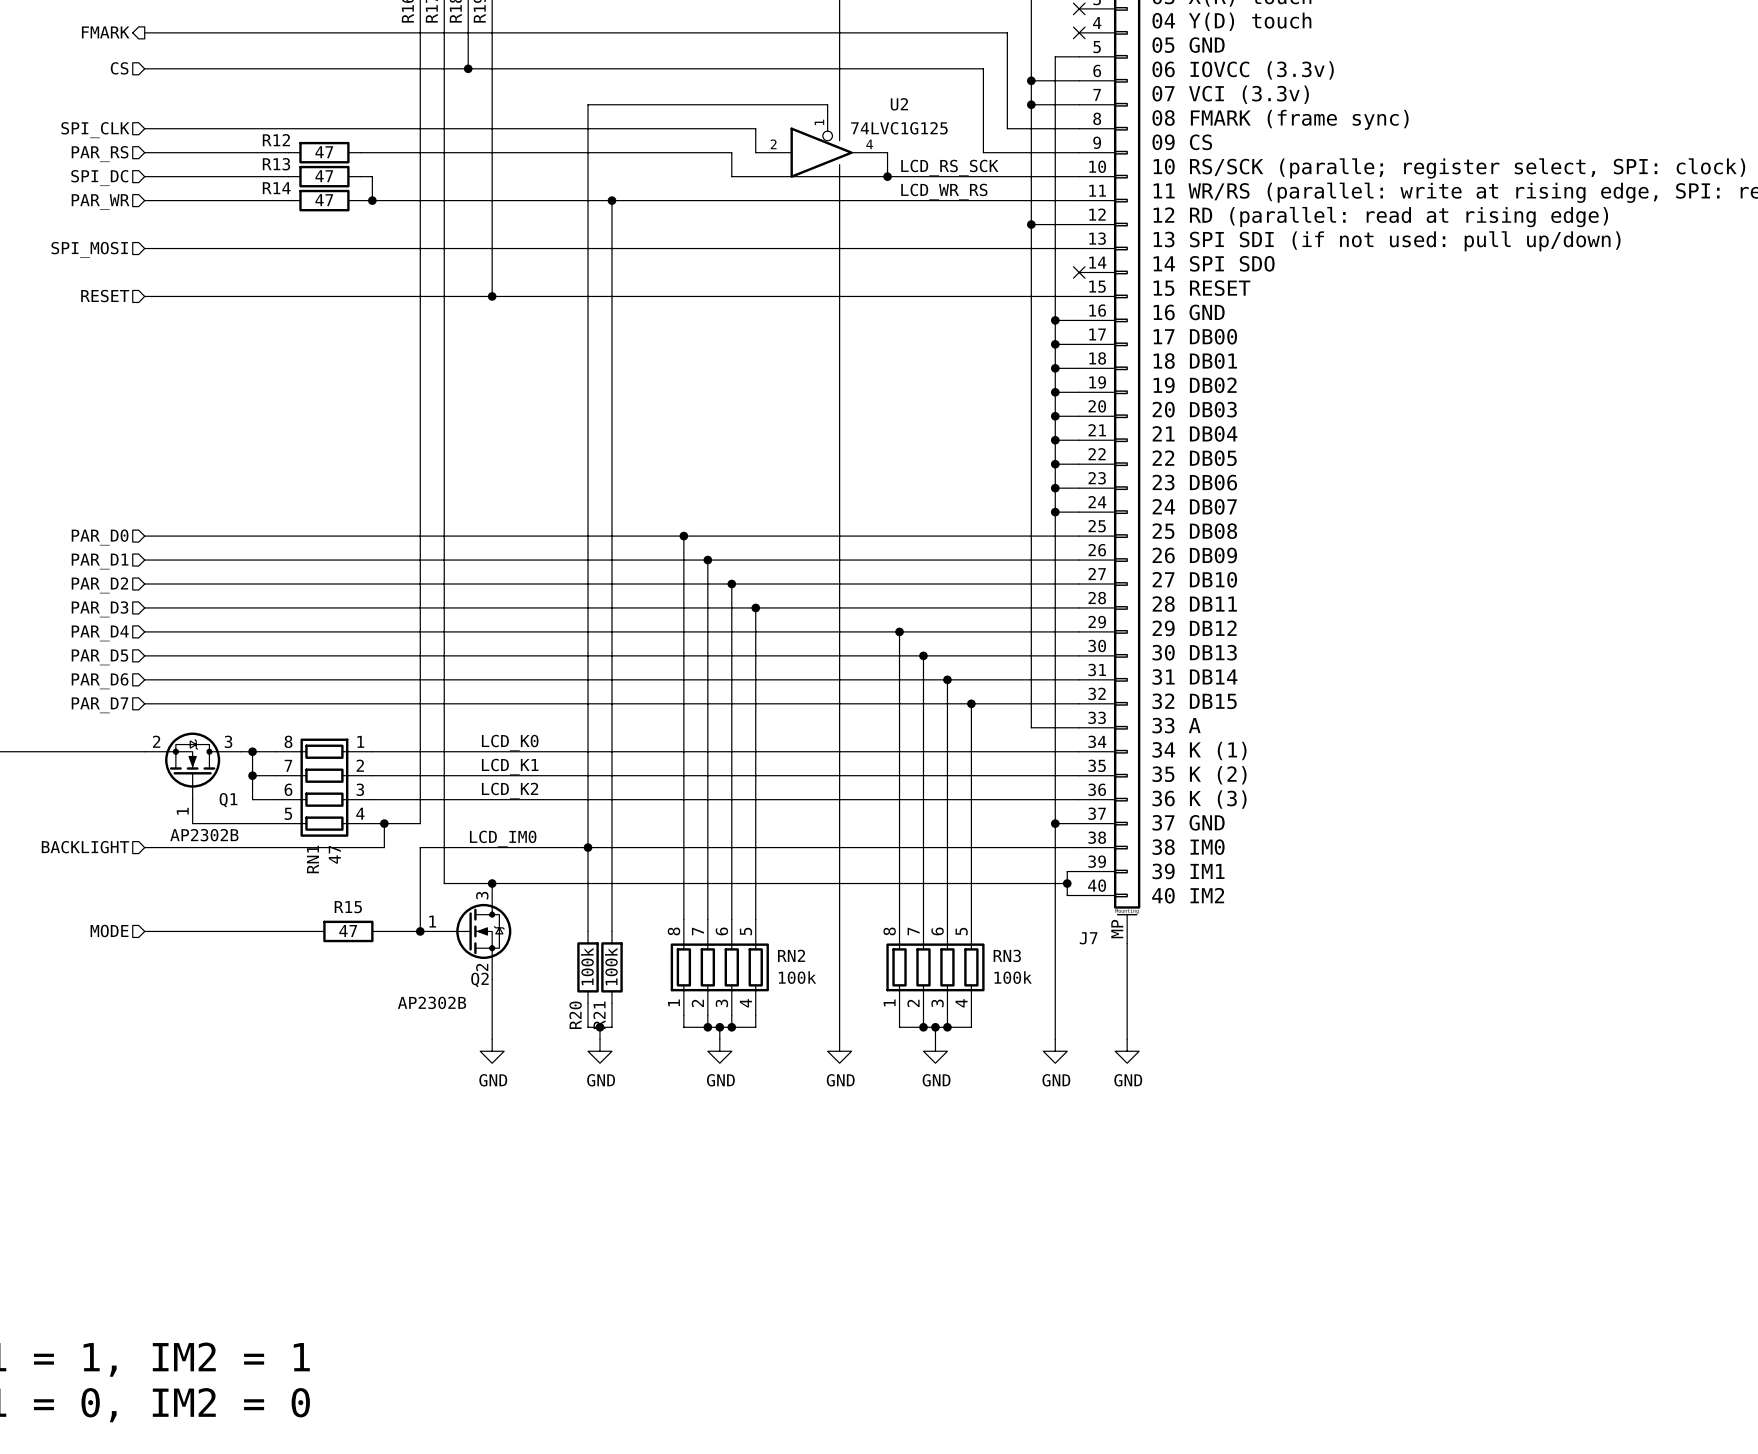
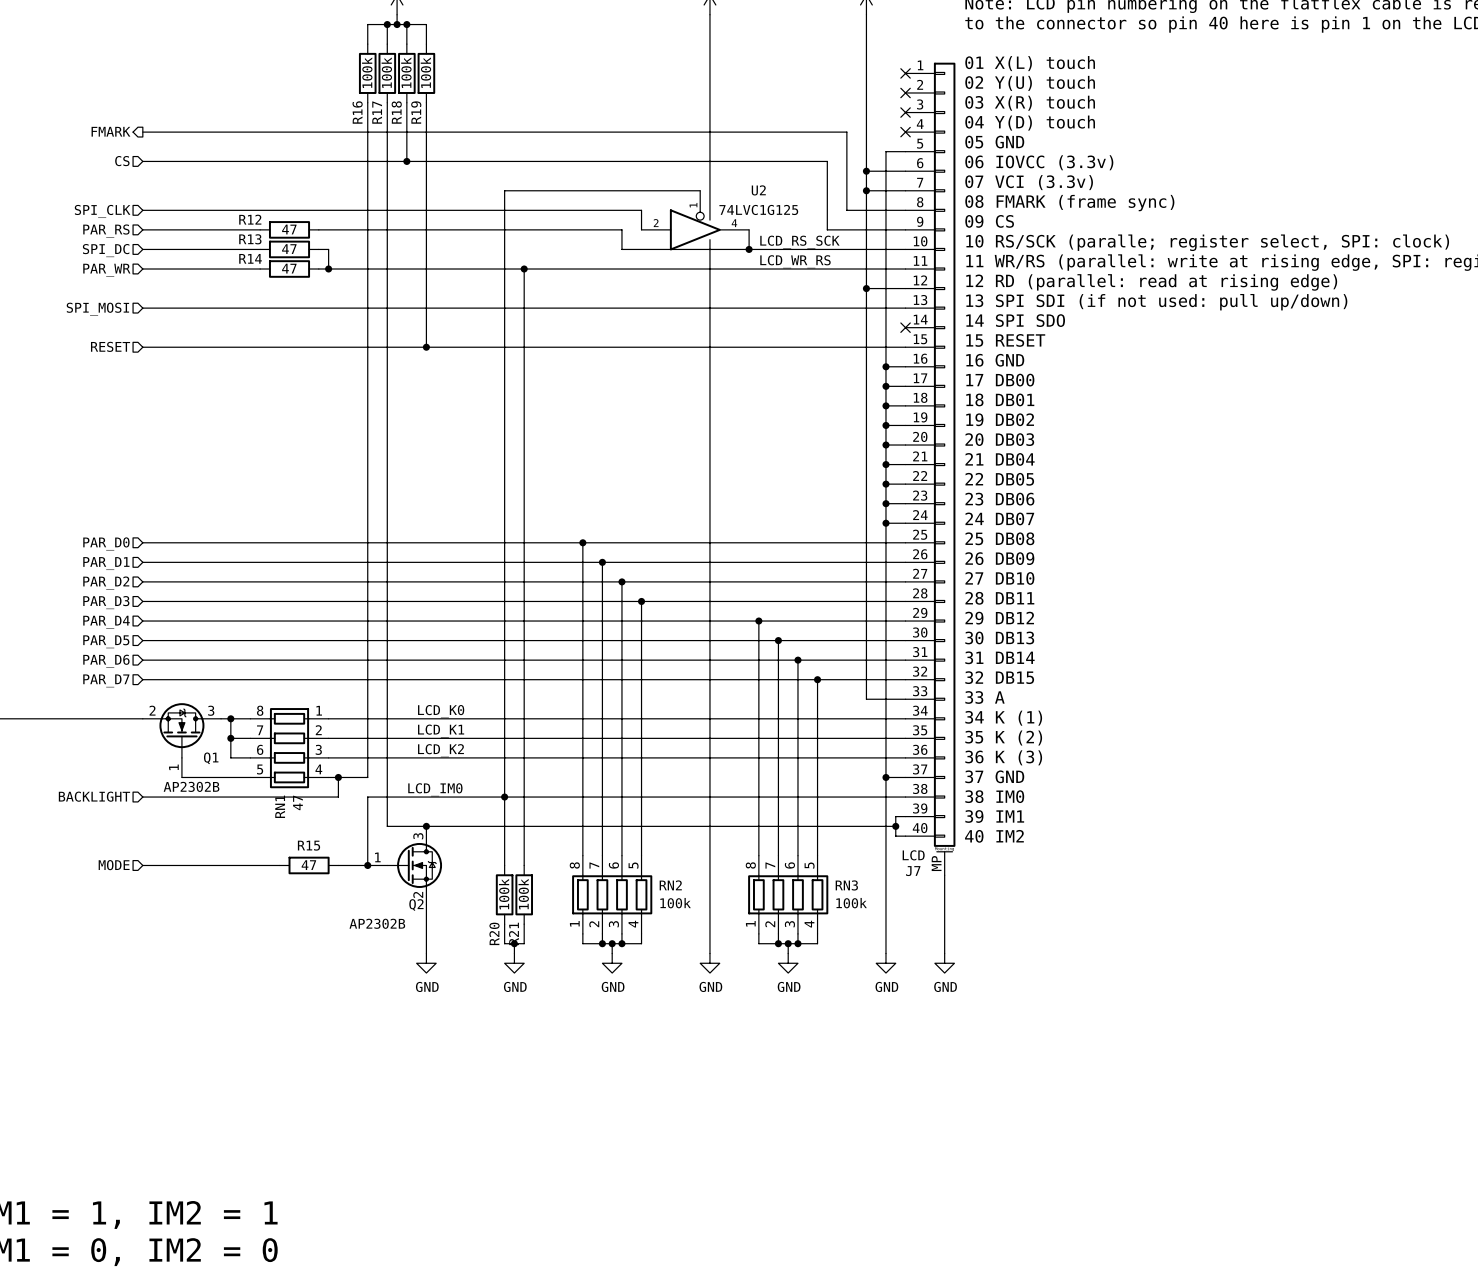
J7 value: none -> LCD (913, 855)

